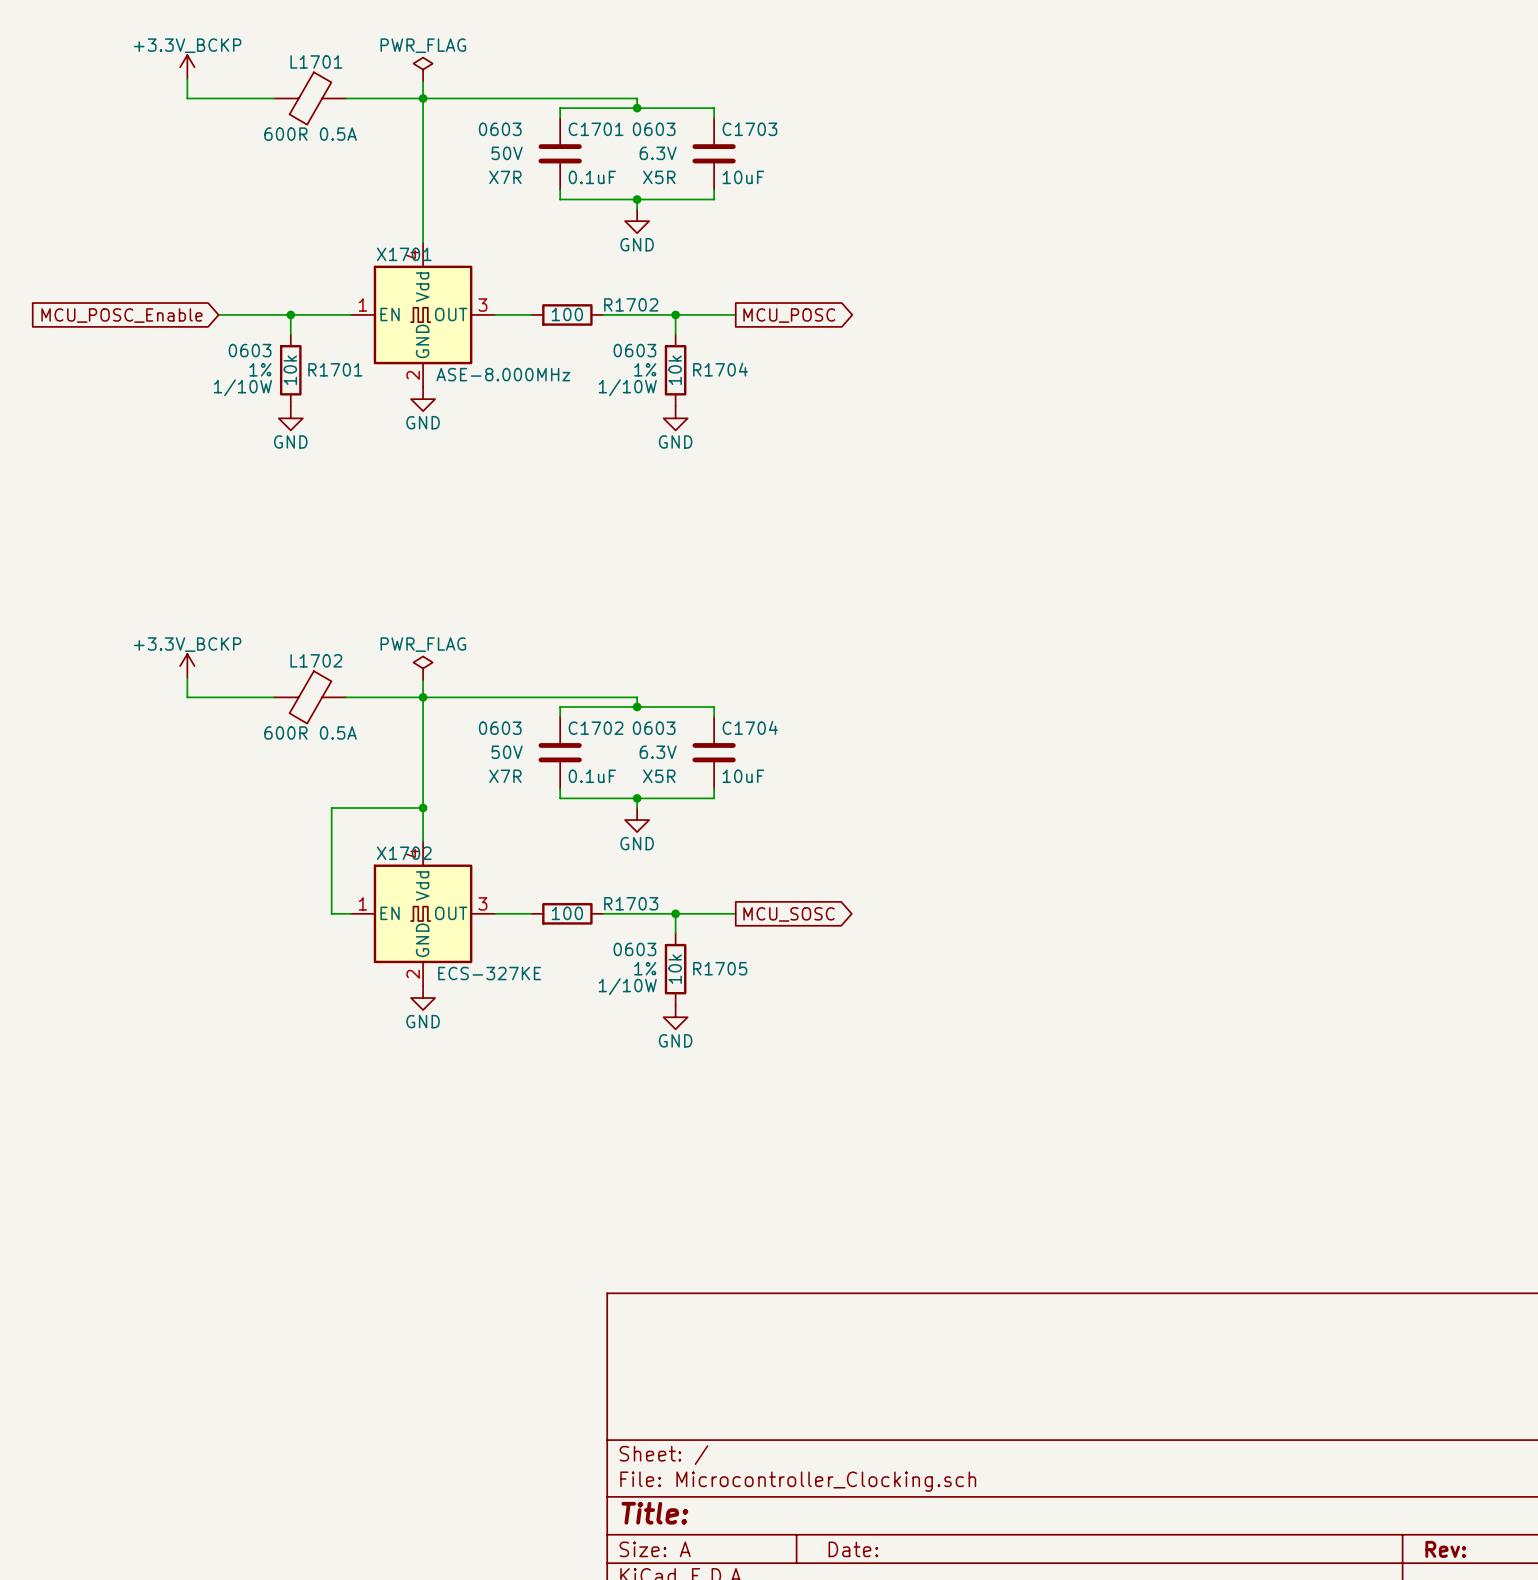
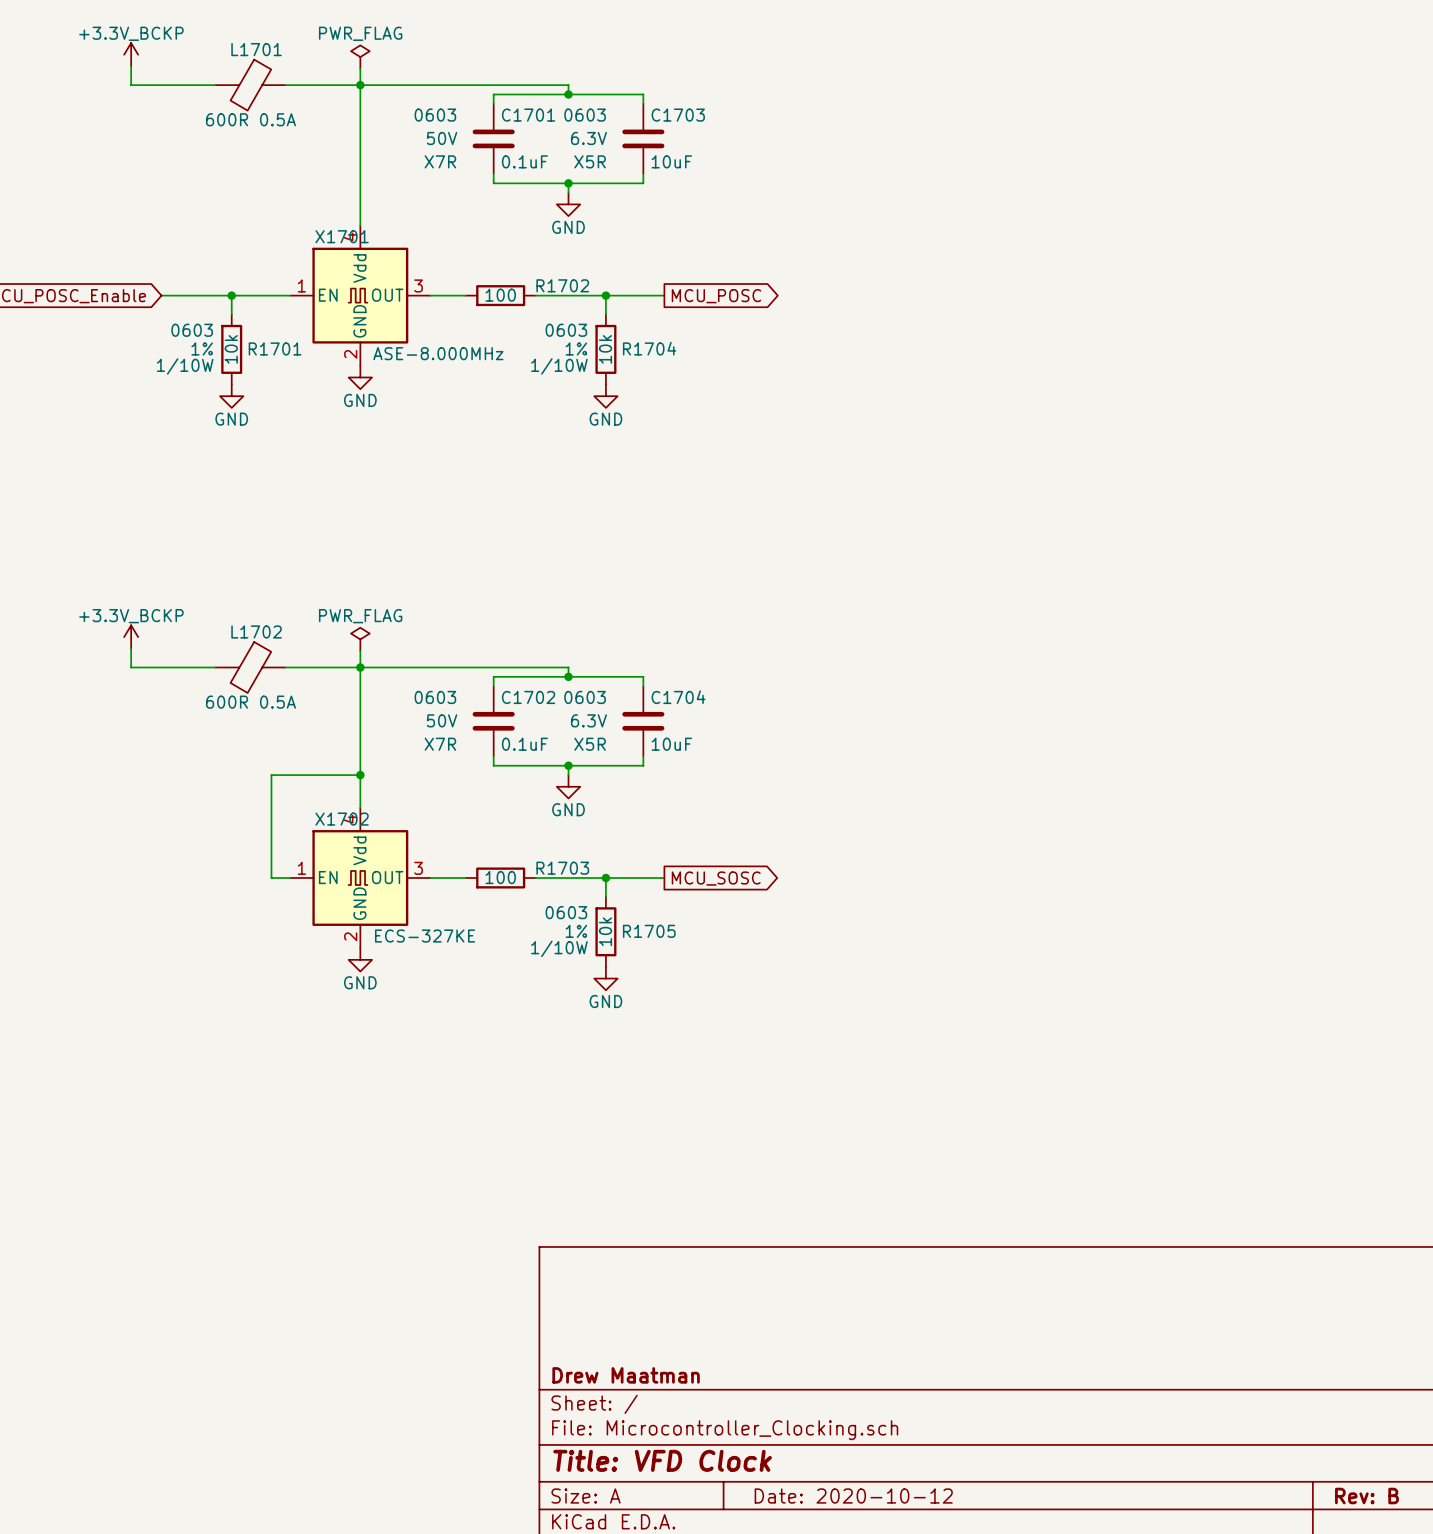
title block: none -> Drew Maatman (626, 1375)
title block: Title: (654, 1513) -> Title: VFD Clock (662, 1460)
title block: Date: (853, 1549) -> Date: 2020-10-12 (853, 1496)
title block: Rev: (1445, 1549) -> Rev: B (1366, 1496)

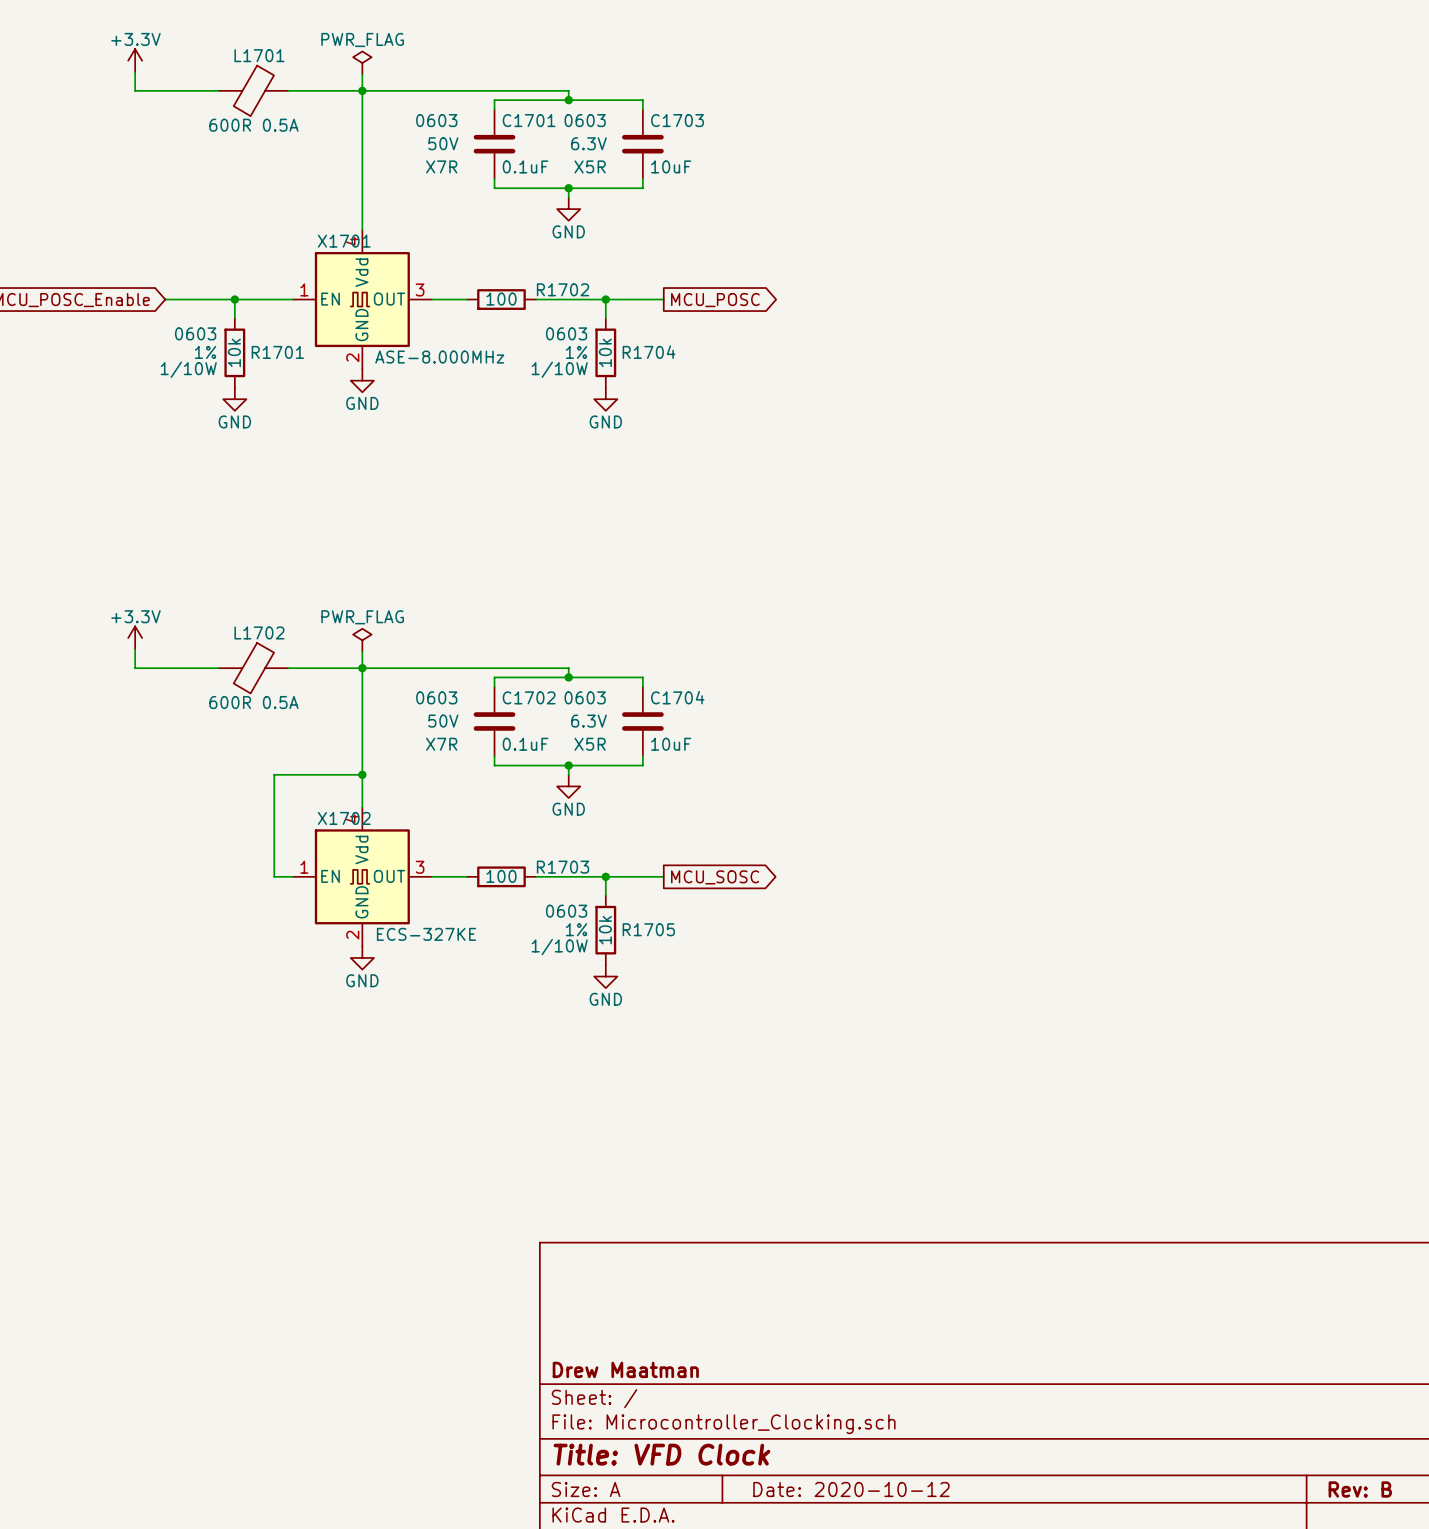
power symbol: +3.3V_BCKP (131, 54) -> +3.3V (135, 60)
power symbol: +3.3V_BCKP (131, 637) -> +3.3V (135, 638)

